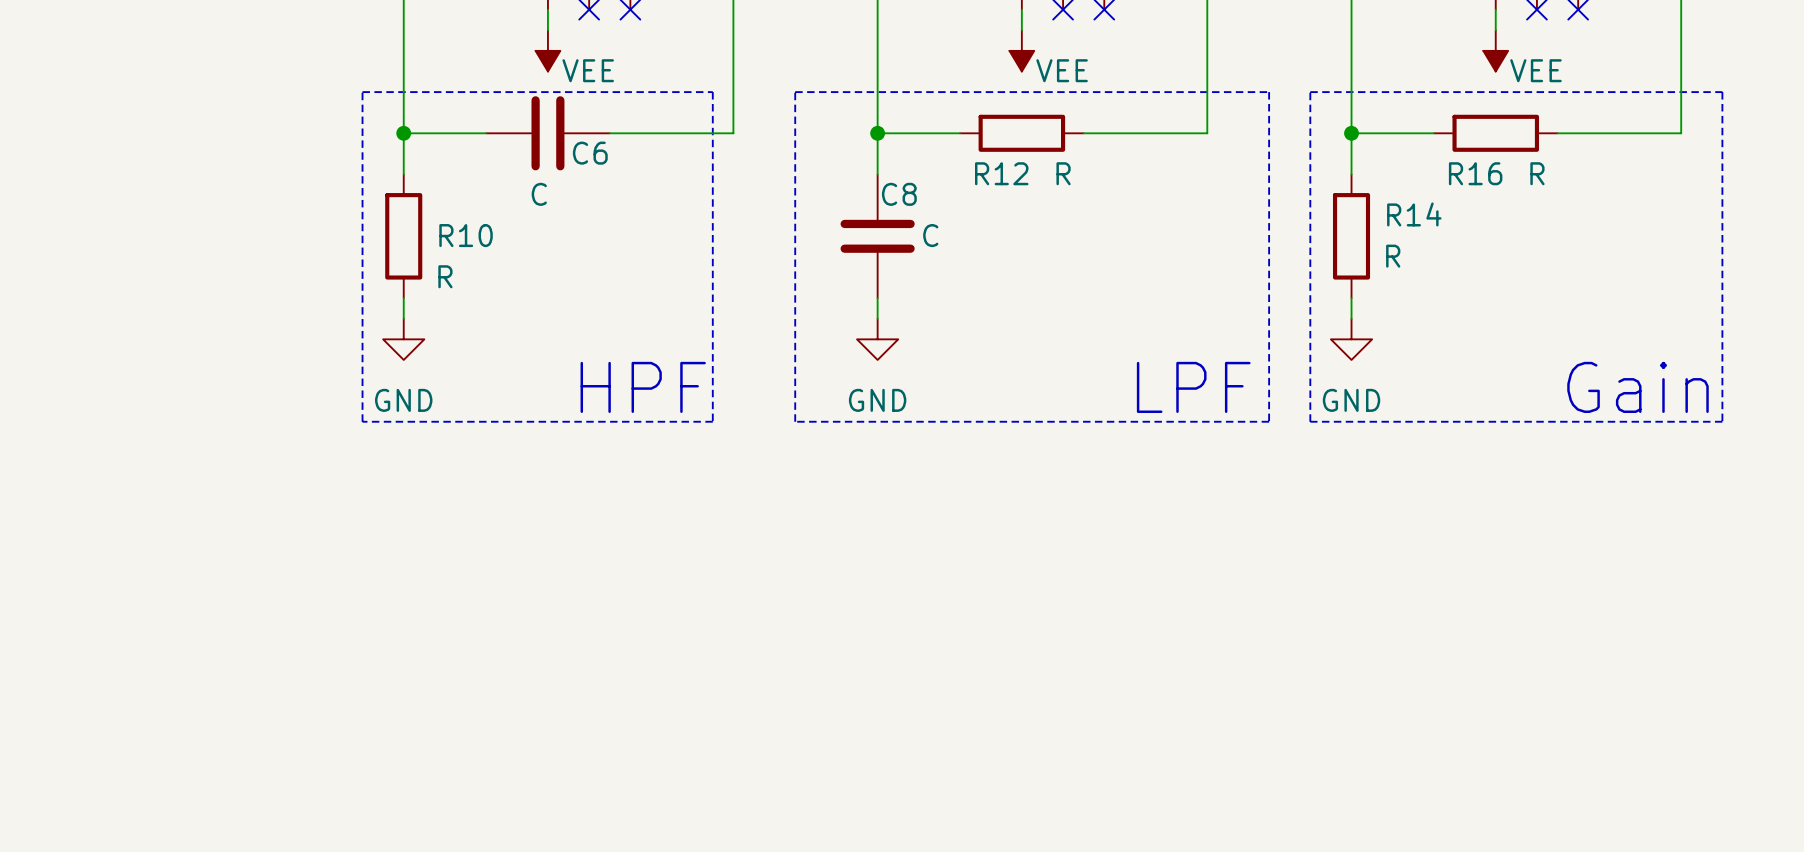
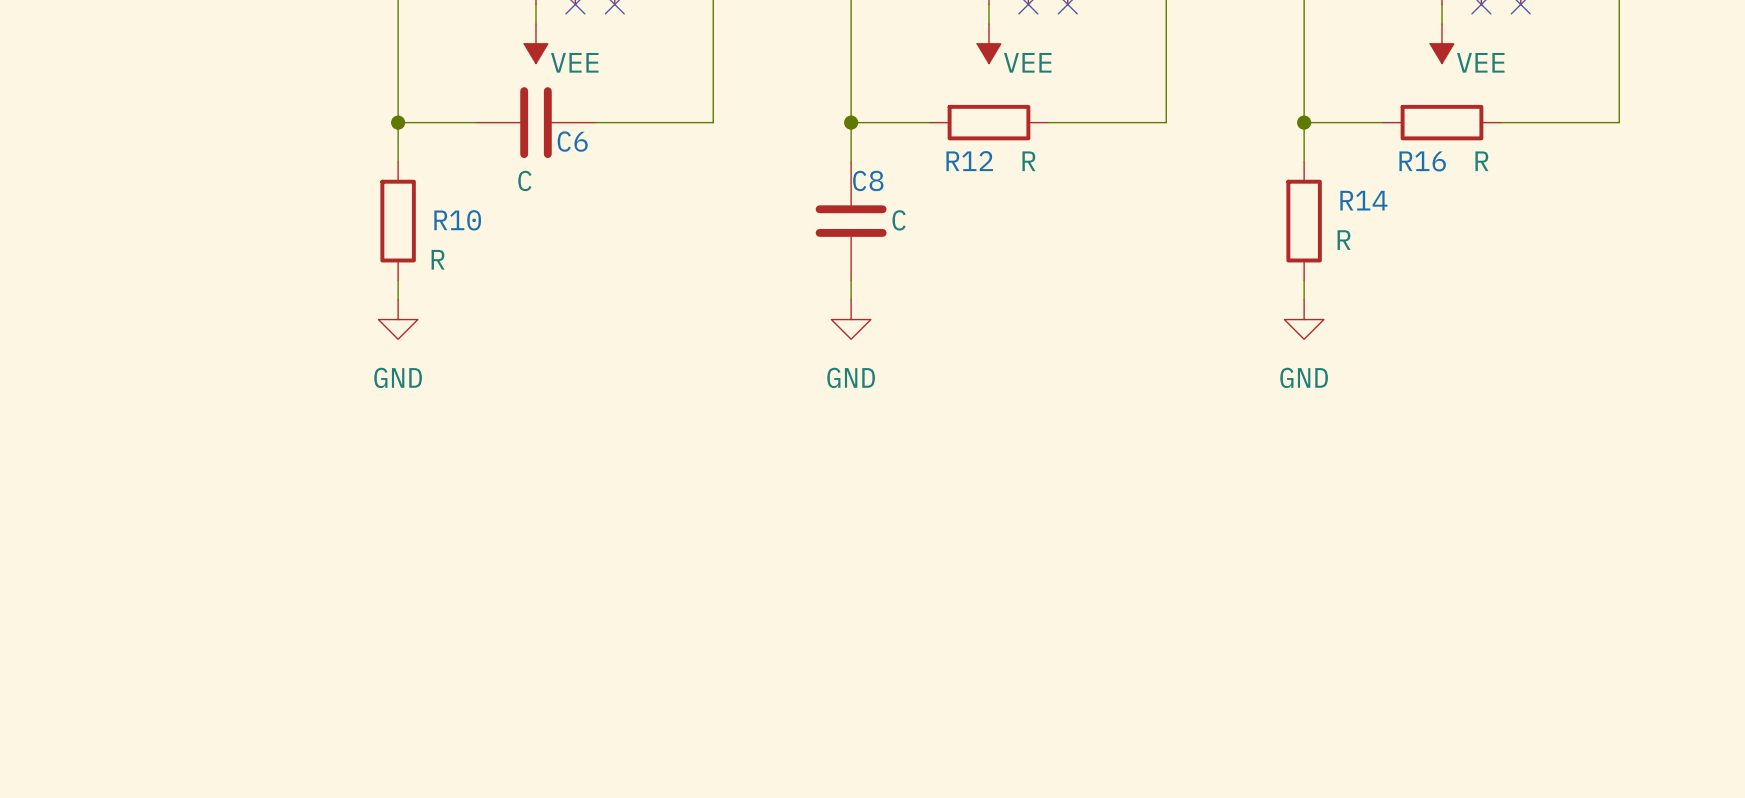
line: (362, 92) (712, 92) (712, 421) (362, 421) (362, 92) -> none
line: (795, 92) (1269, 92) (1269, 421) (795, 421) (795, 92) -> none
line: (1310, 92) (1722, 92) (1722, 421) (1310, 421) (1310, 92) -> none
text: HPF (643, 387) -> none
text: LPF (1193, 387) -> none
text: Gain (1637, 387) -> none

